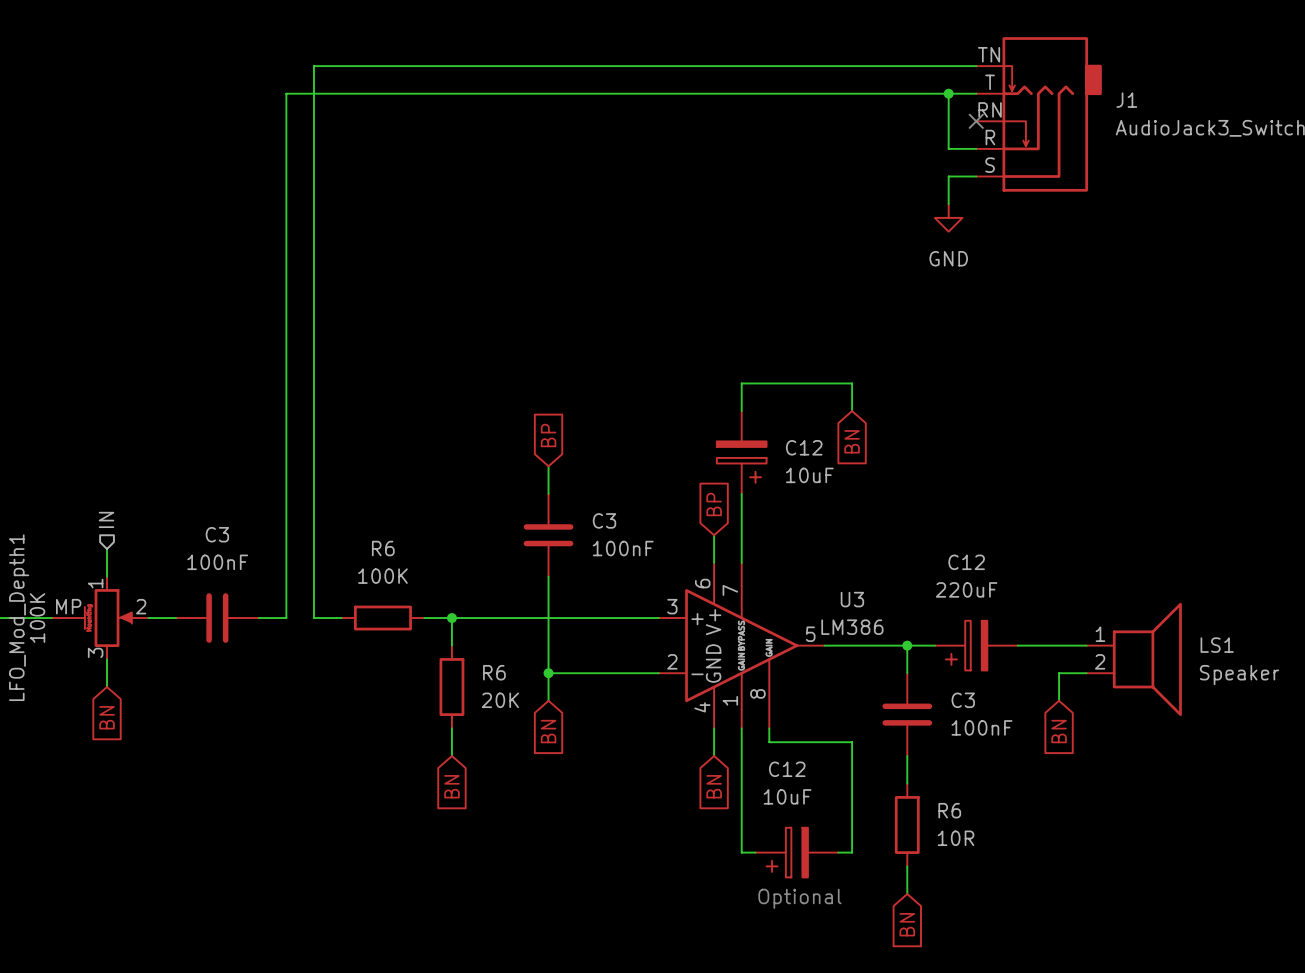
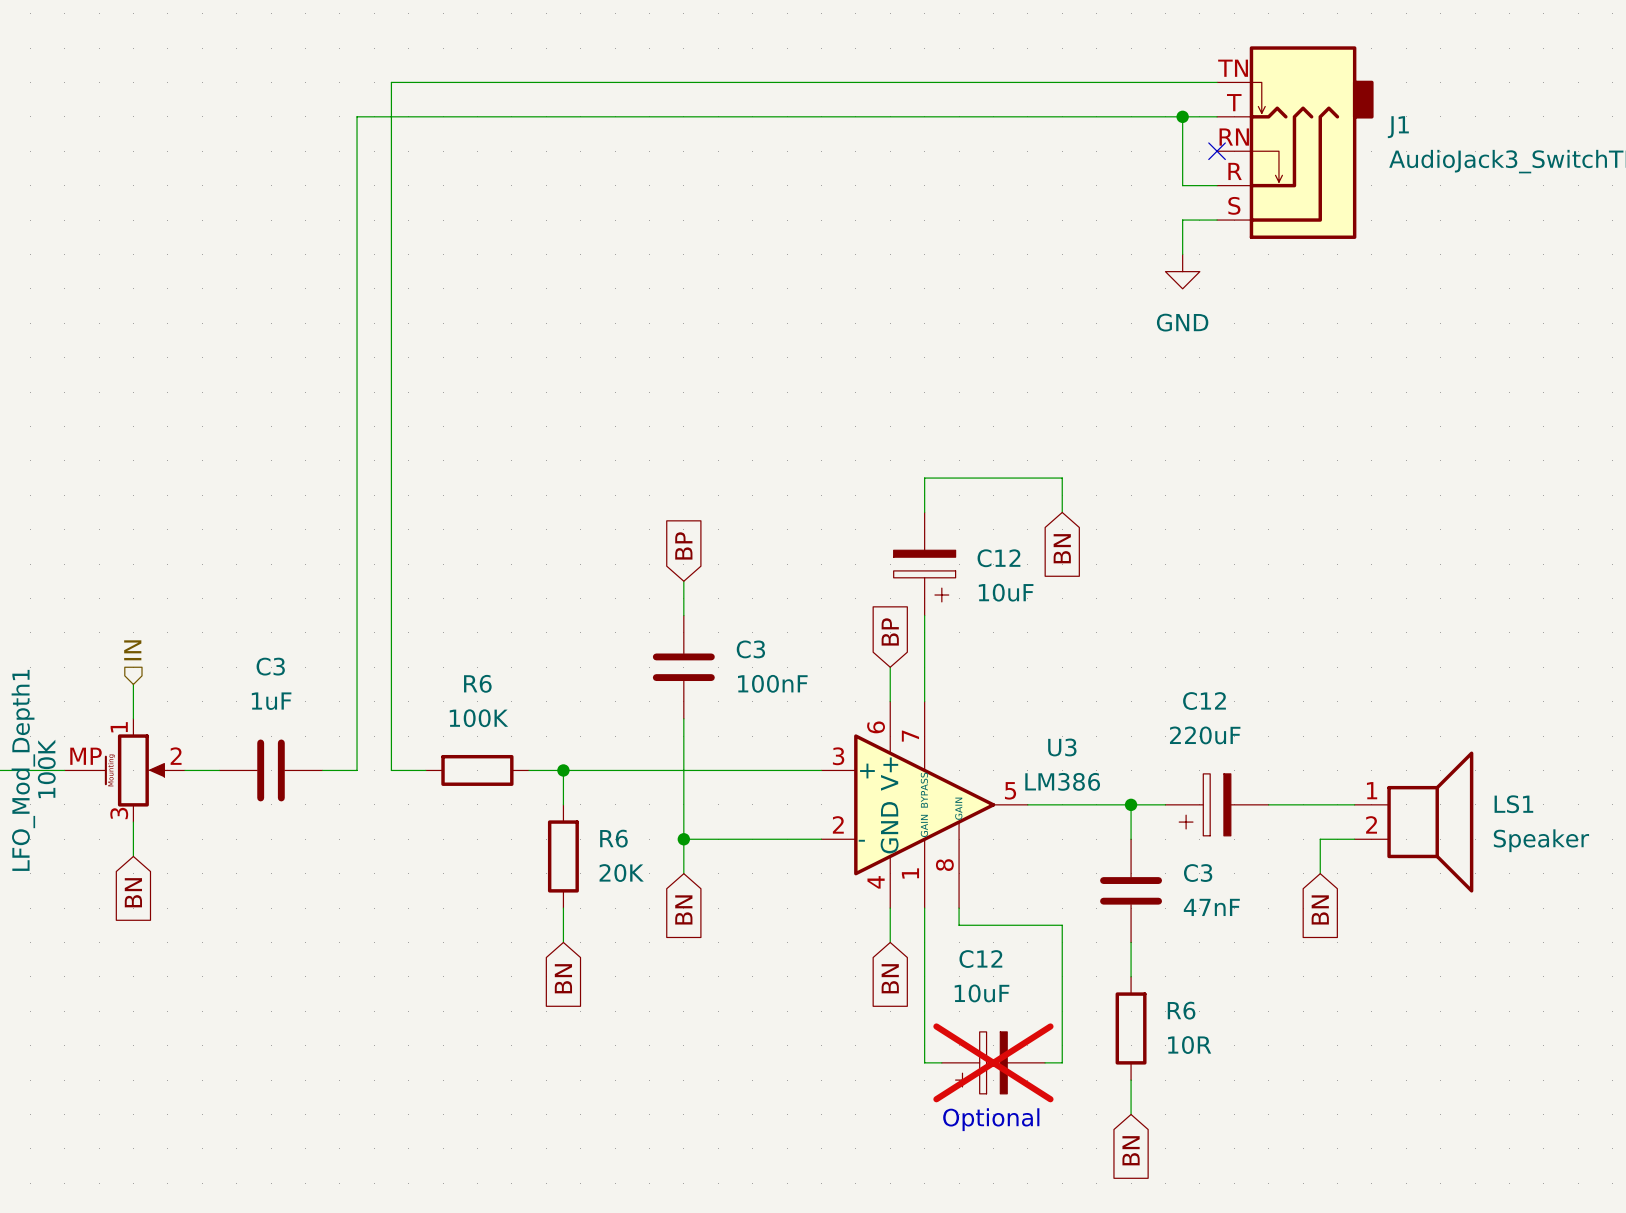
C3 value: 100nF (217, 562) -> 1uF (271, 701)
C3 value: 100nF (981, 727) -> 47nF (1211, 907)
C12 do-not-place cross: none -> (993, 1062)

